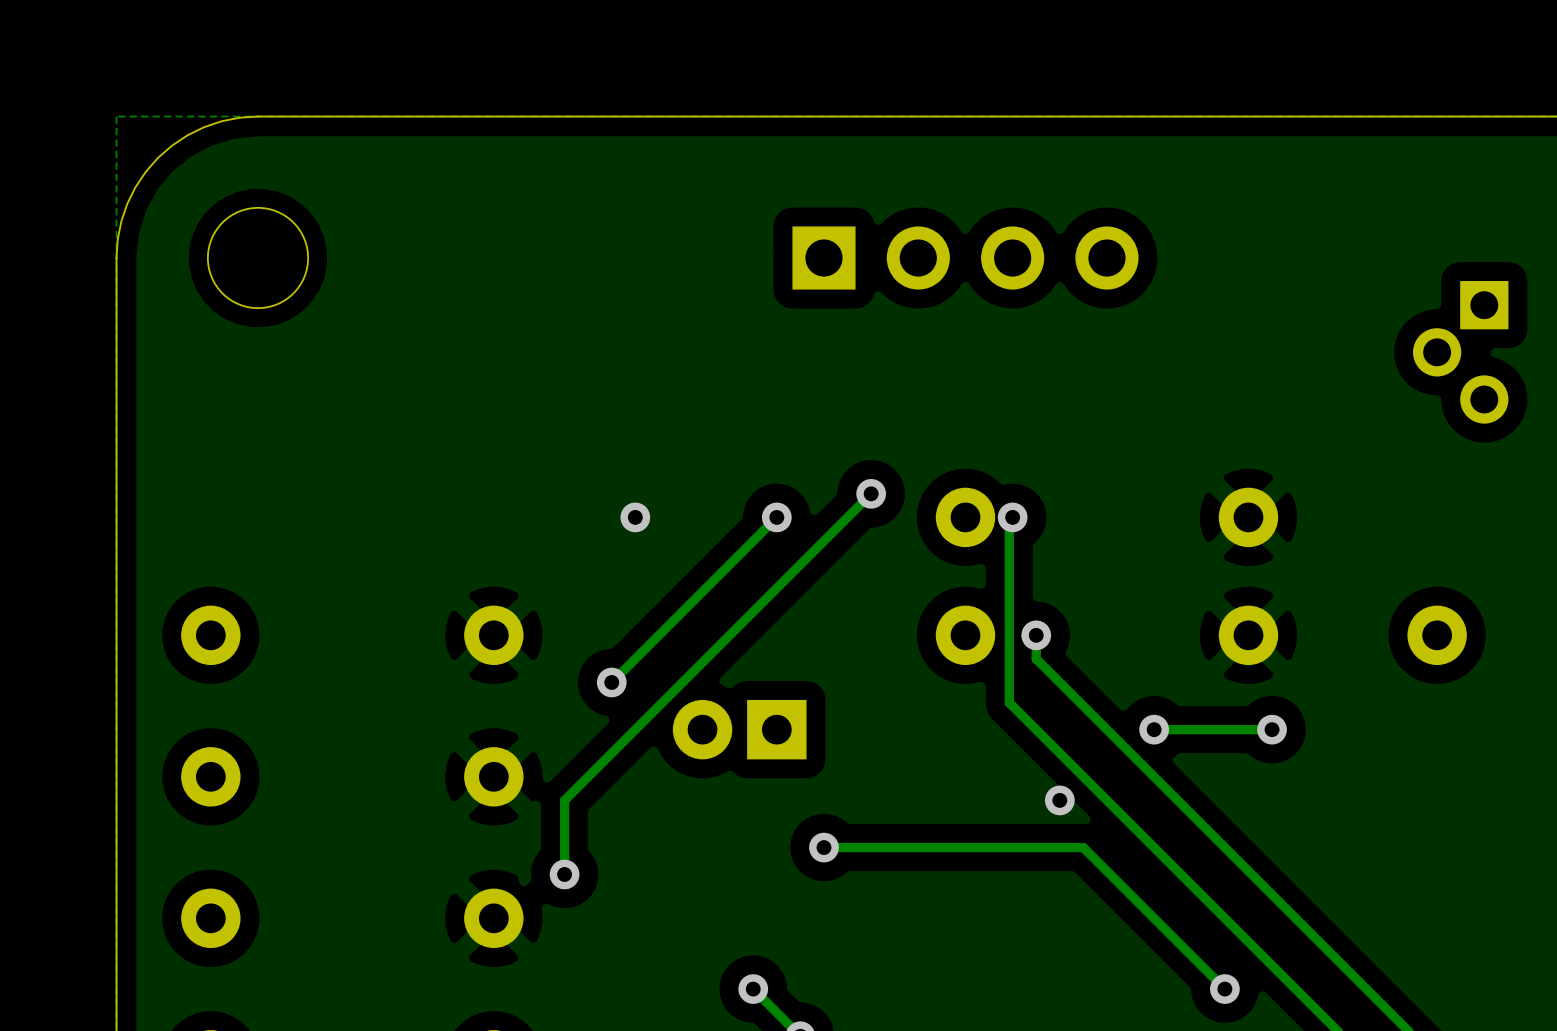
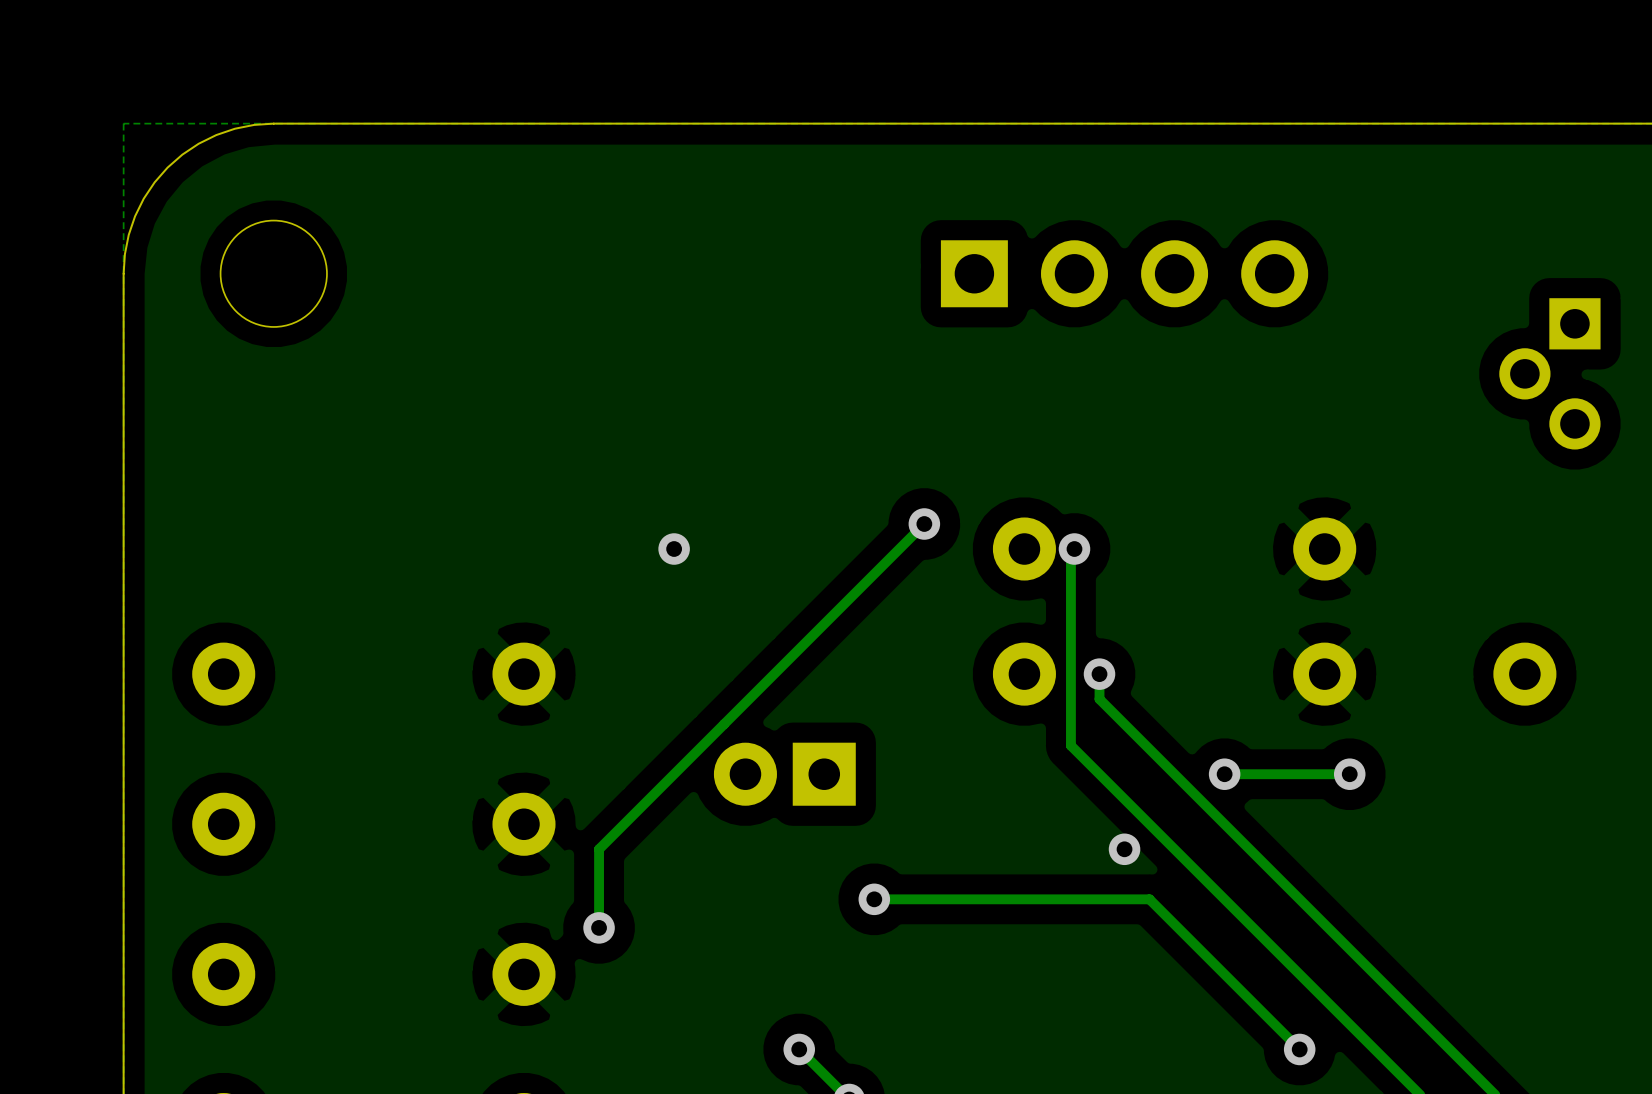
part position: (965, 258) -> (1124, 273)
track: (776, 517) (611, 682) -> none
via: (776, 517) -> none
via: (611, 682) -> none

